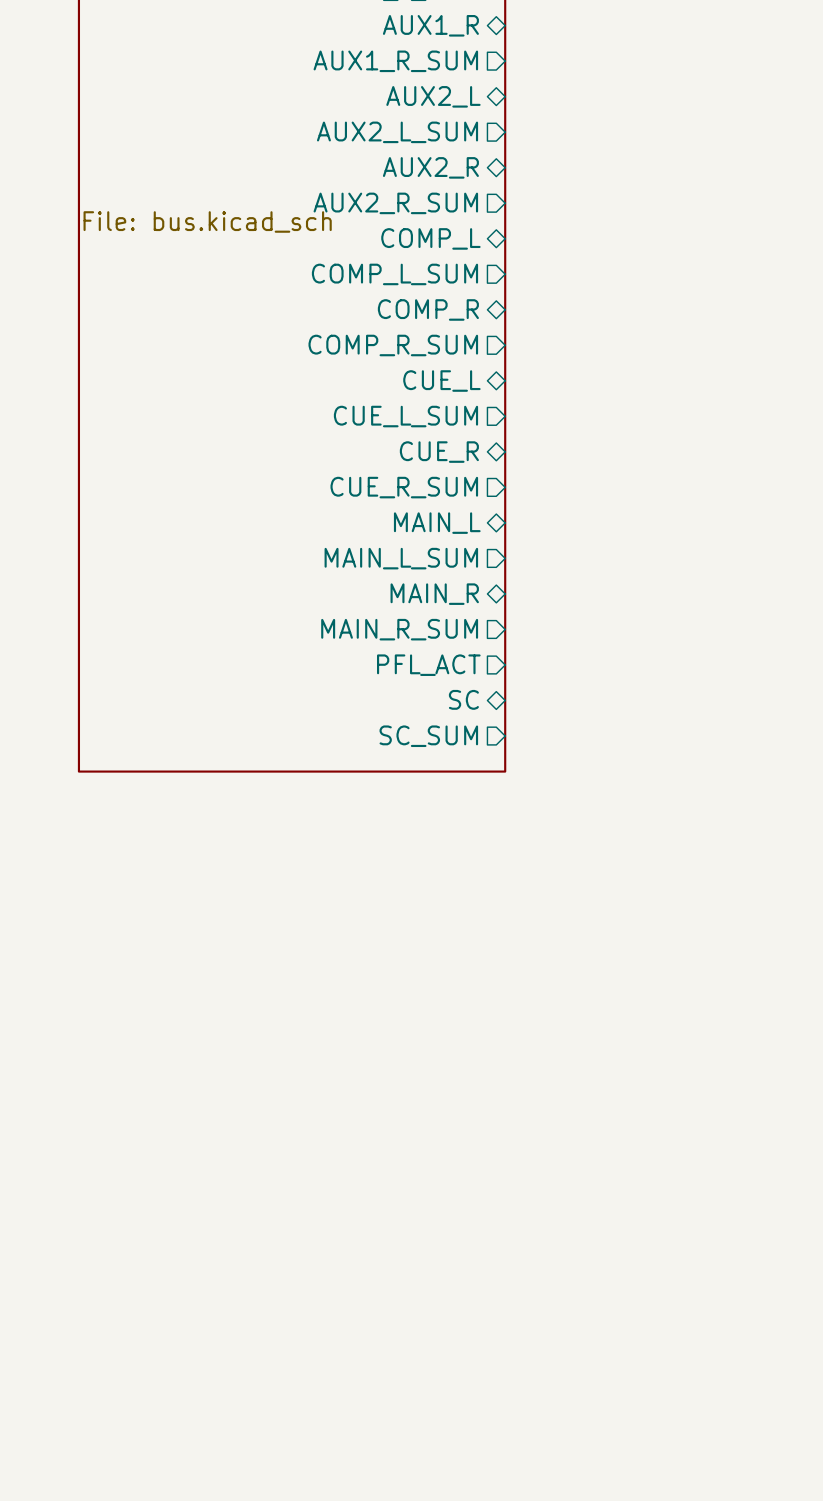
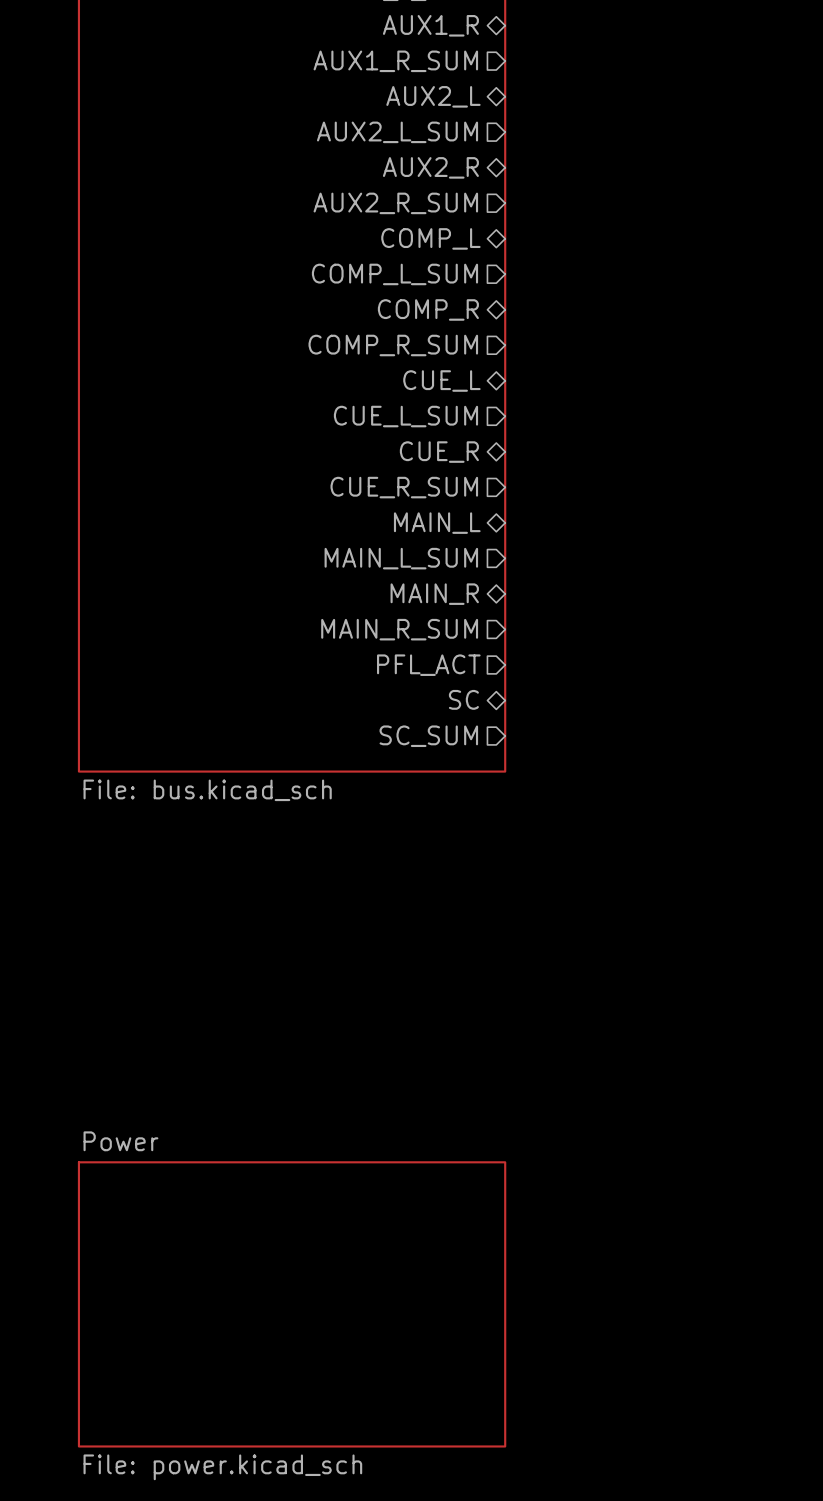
sheet value position: File: bus.kicad_sch (207, 221) -> File: bus.kicad_sch (207, 790)
sheet Power: none -> File: power.kicad_sch (292, 1304)

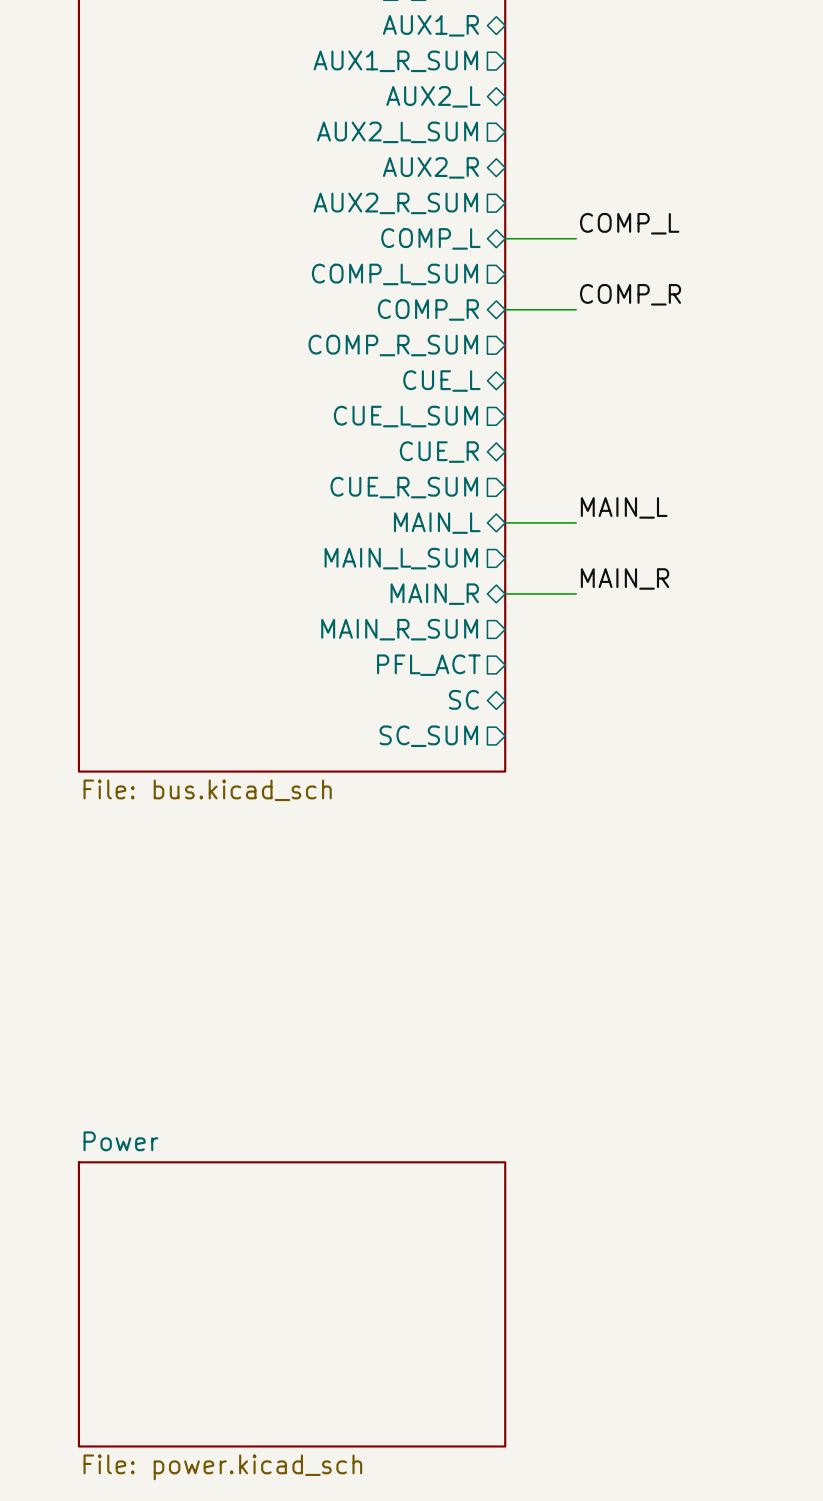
label: none -> COMP_L (629, 223)
wire: none -> (505, 238) (576, 238)
label: none -> COMP_R (630, 294)
wire: none -> (505, 309) (576, 309)
label: none -> MAIN_L (624, 507)
wire: none -> (505, 522) (576, 522)
label: none -> MAIN_R (625, 578)
wire: none -> (505, 593) (576, 593)

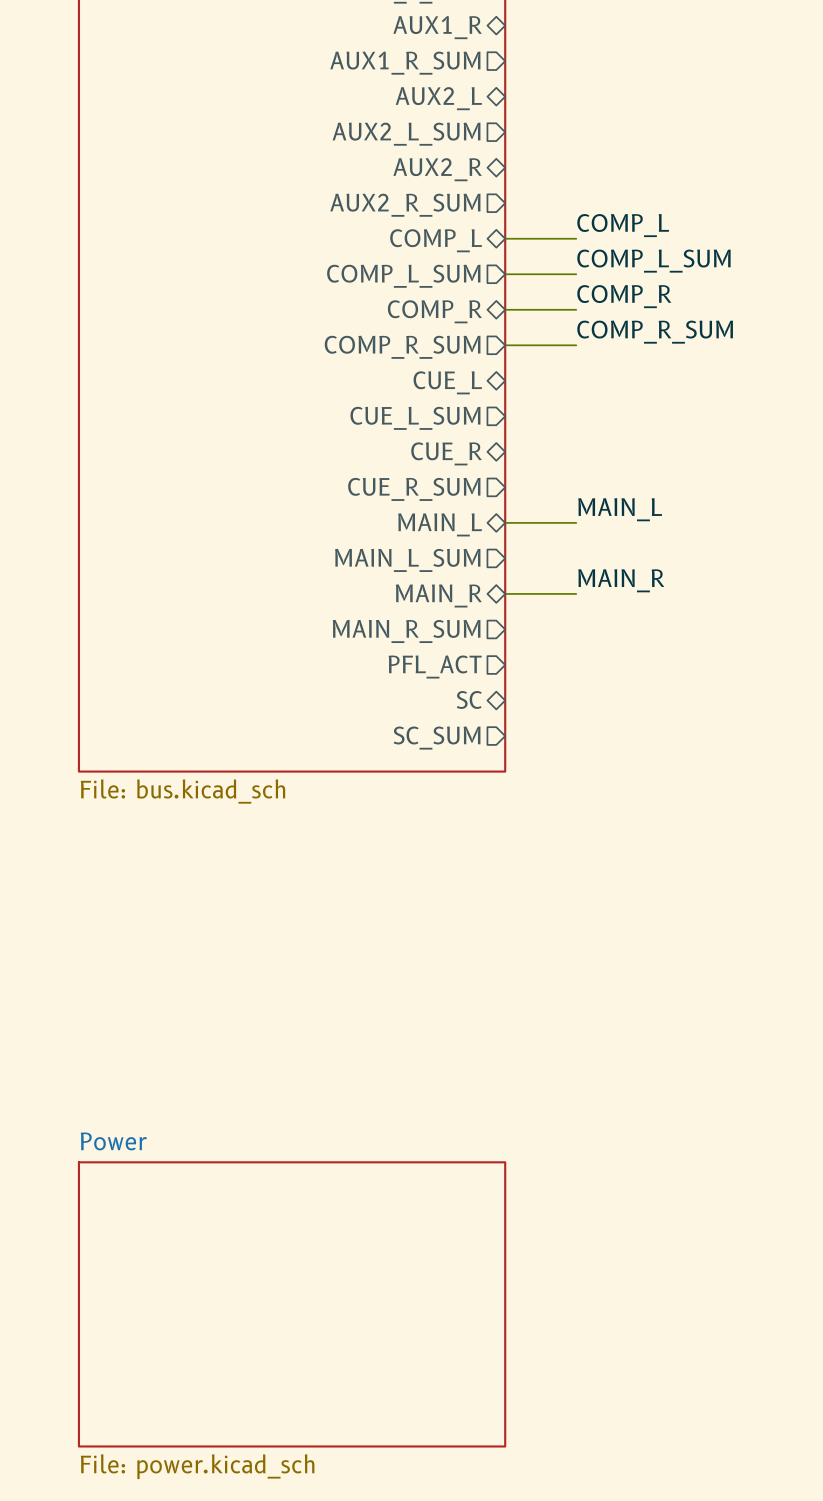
label: none -> COMP_L_SUM (653, 261)
wire: none -> (505, 274) (576, 274)
label: none -> COMP_R_SUM (655, 332)
wire: none -> (505, 345) (576, 345)

